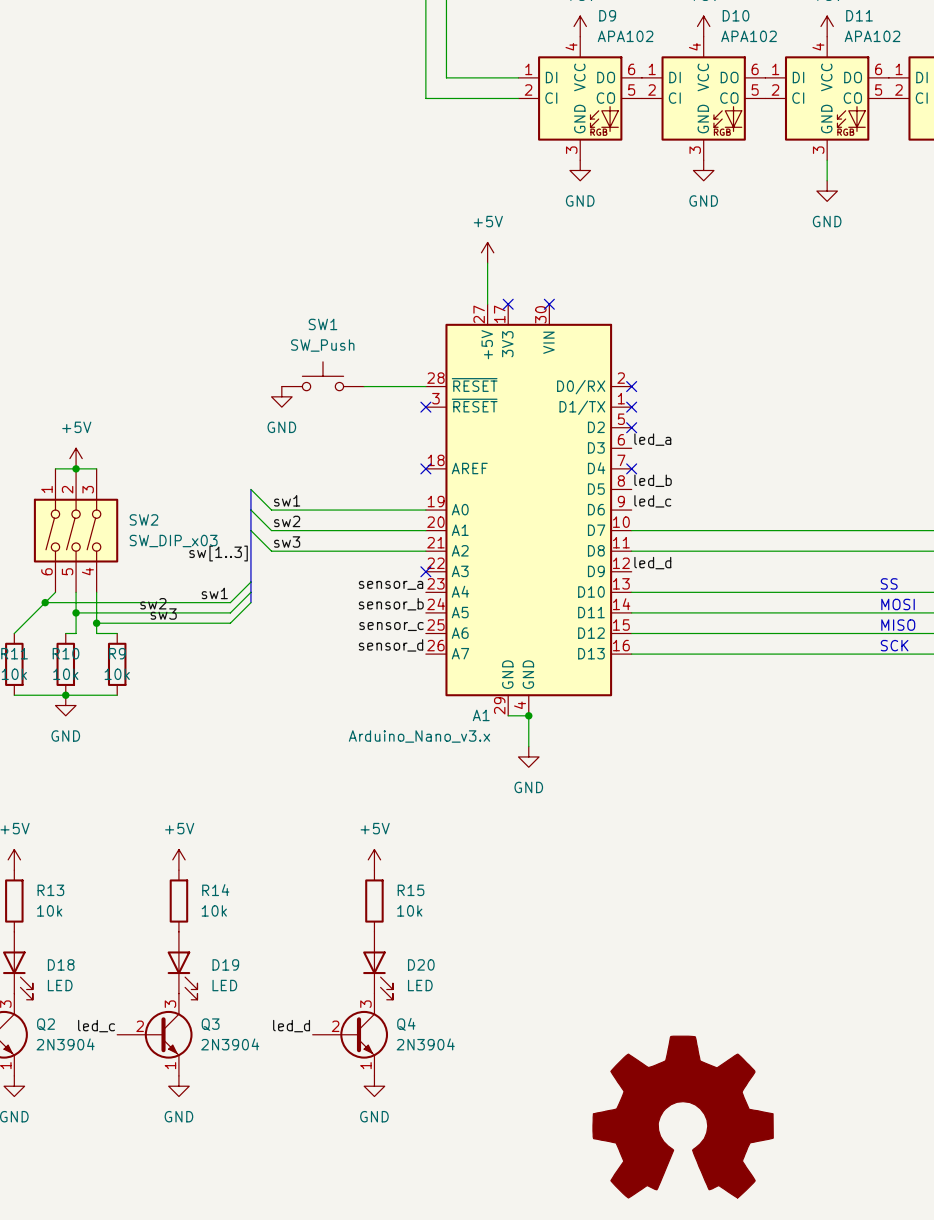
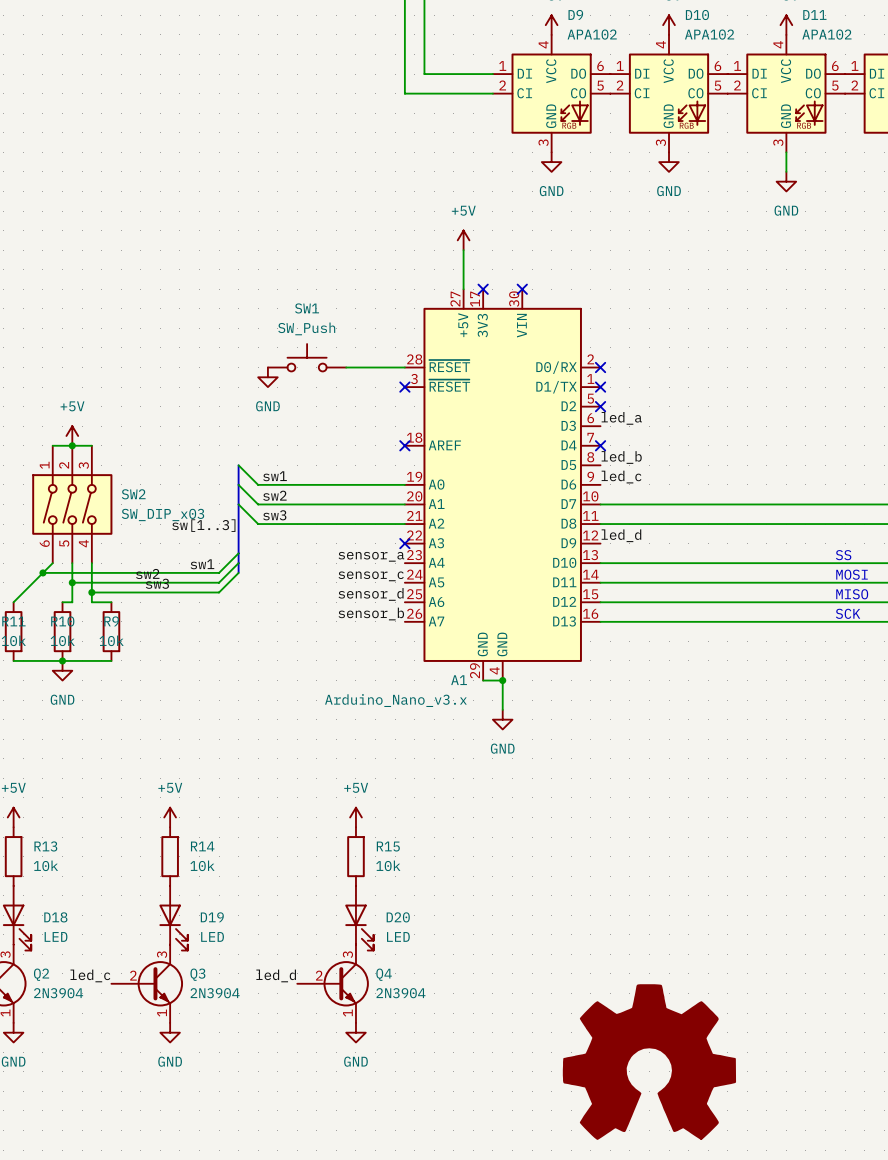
label: sensor_b (391, 604) -> sensor_c (371, 576)
label: sensor_c (391, 626) -> sensor_d (371, 594)
label: sensor_d (391, 645) -> sensor_b (371, 614)

